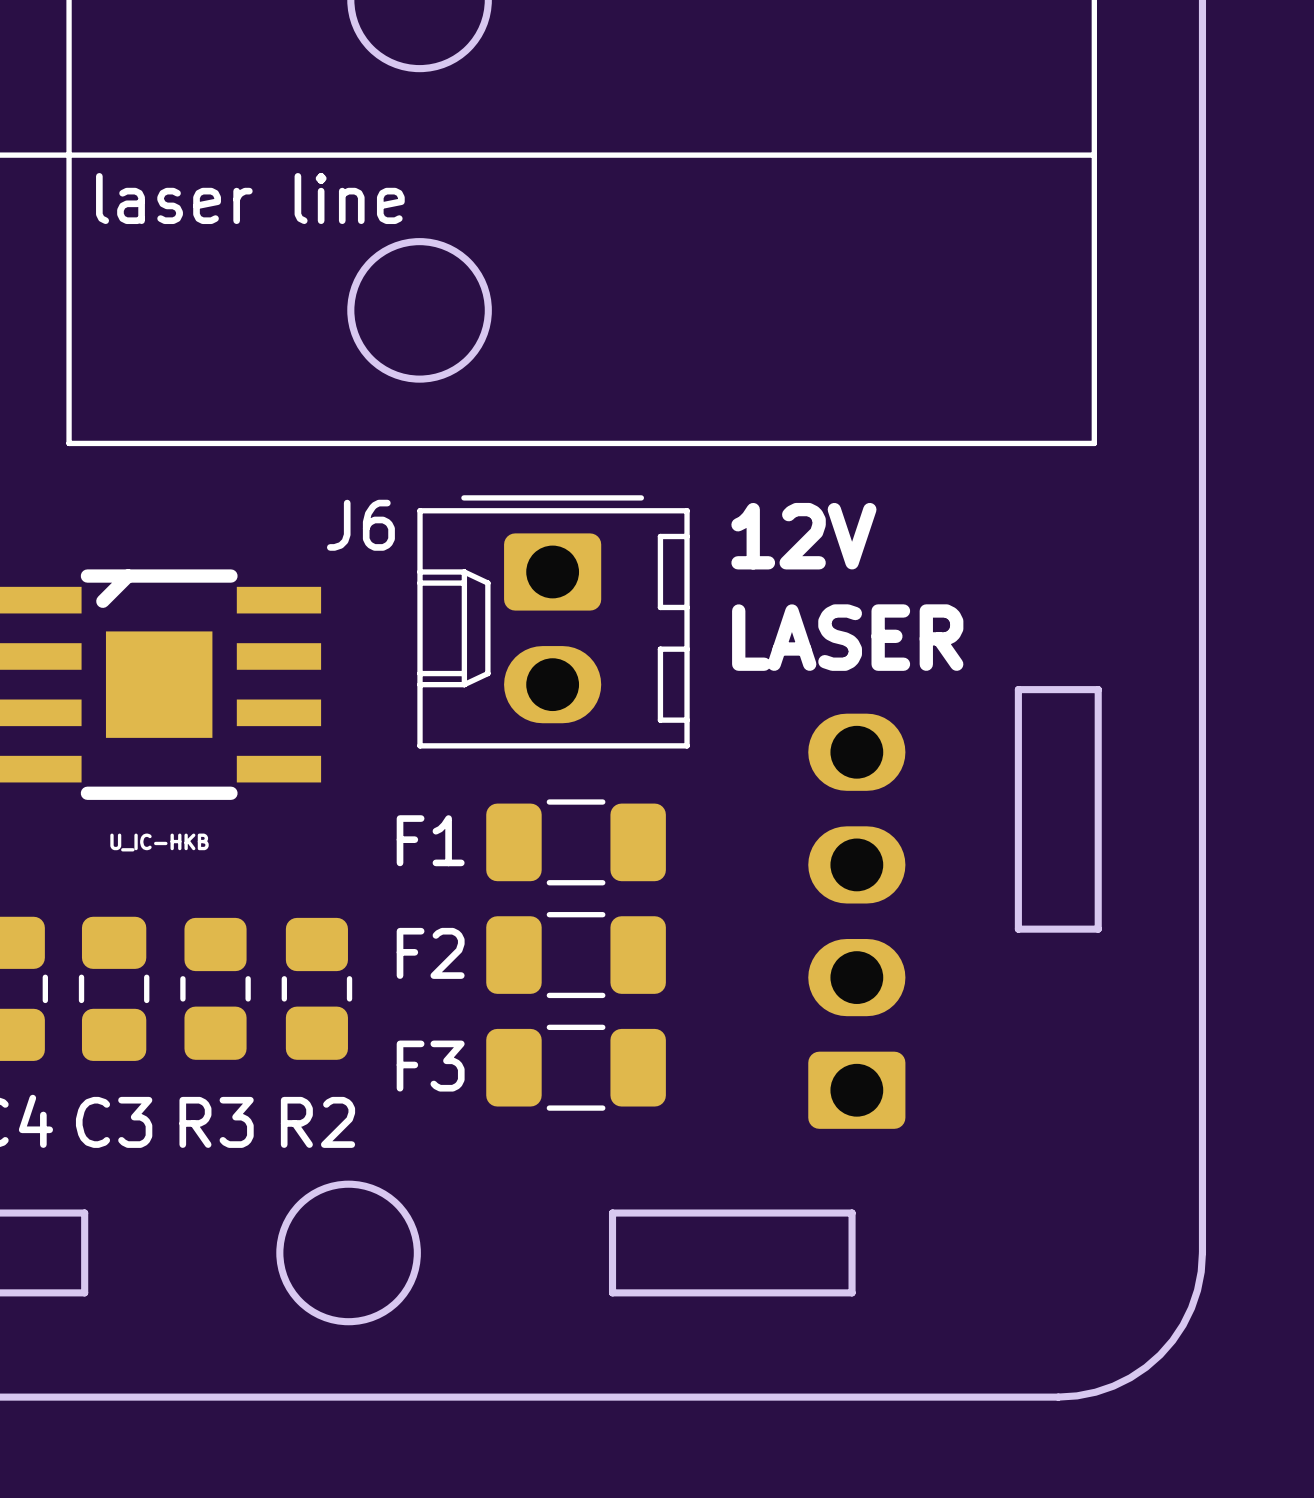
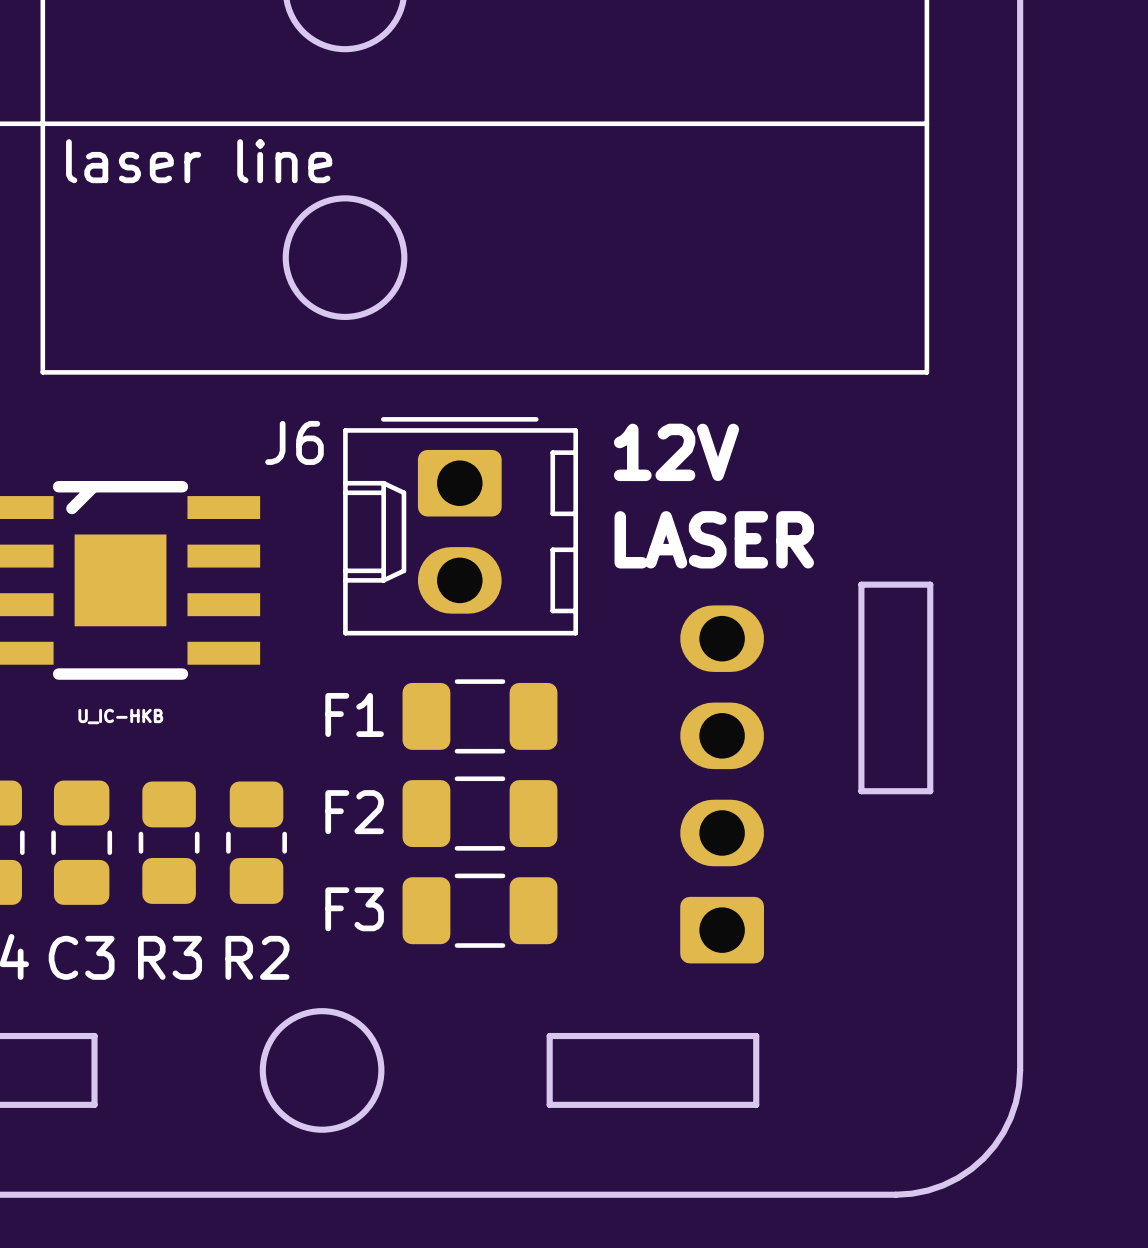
board edge: (84, 1213) (84, 1292) -> (56, 1036) (94, 1036) (94, 1104) (56, 1104)
board edge: (656, 1213) (612, 1213) (612, 1292) (656, 1292) -> (549, 1036) (549, 1104)
board edge: (852, 1213) (852, 1292) -> (717, 1036) (756, 1036) (756, 1104) (717, 1104)
round board edge position: (348, 1252) -> (322, 1070)

